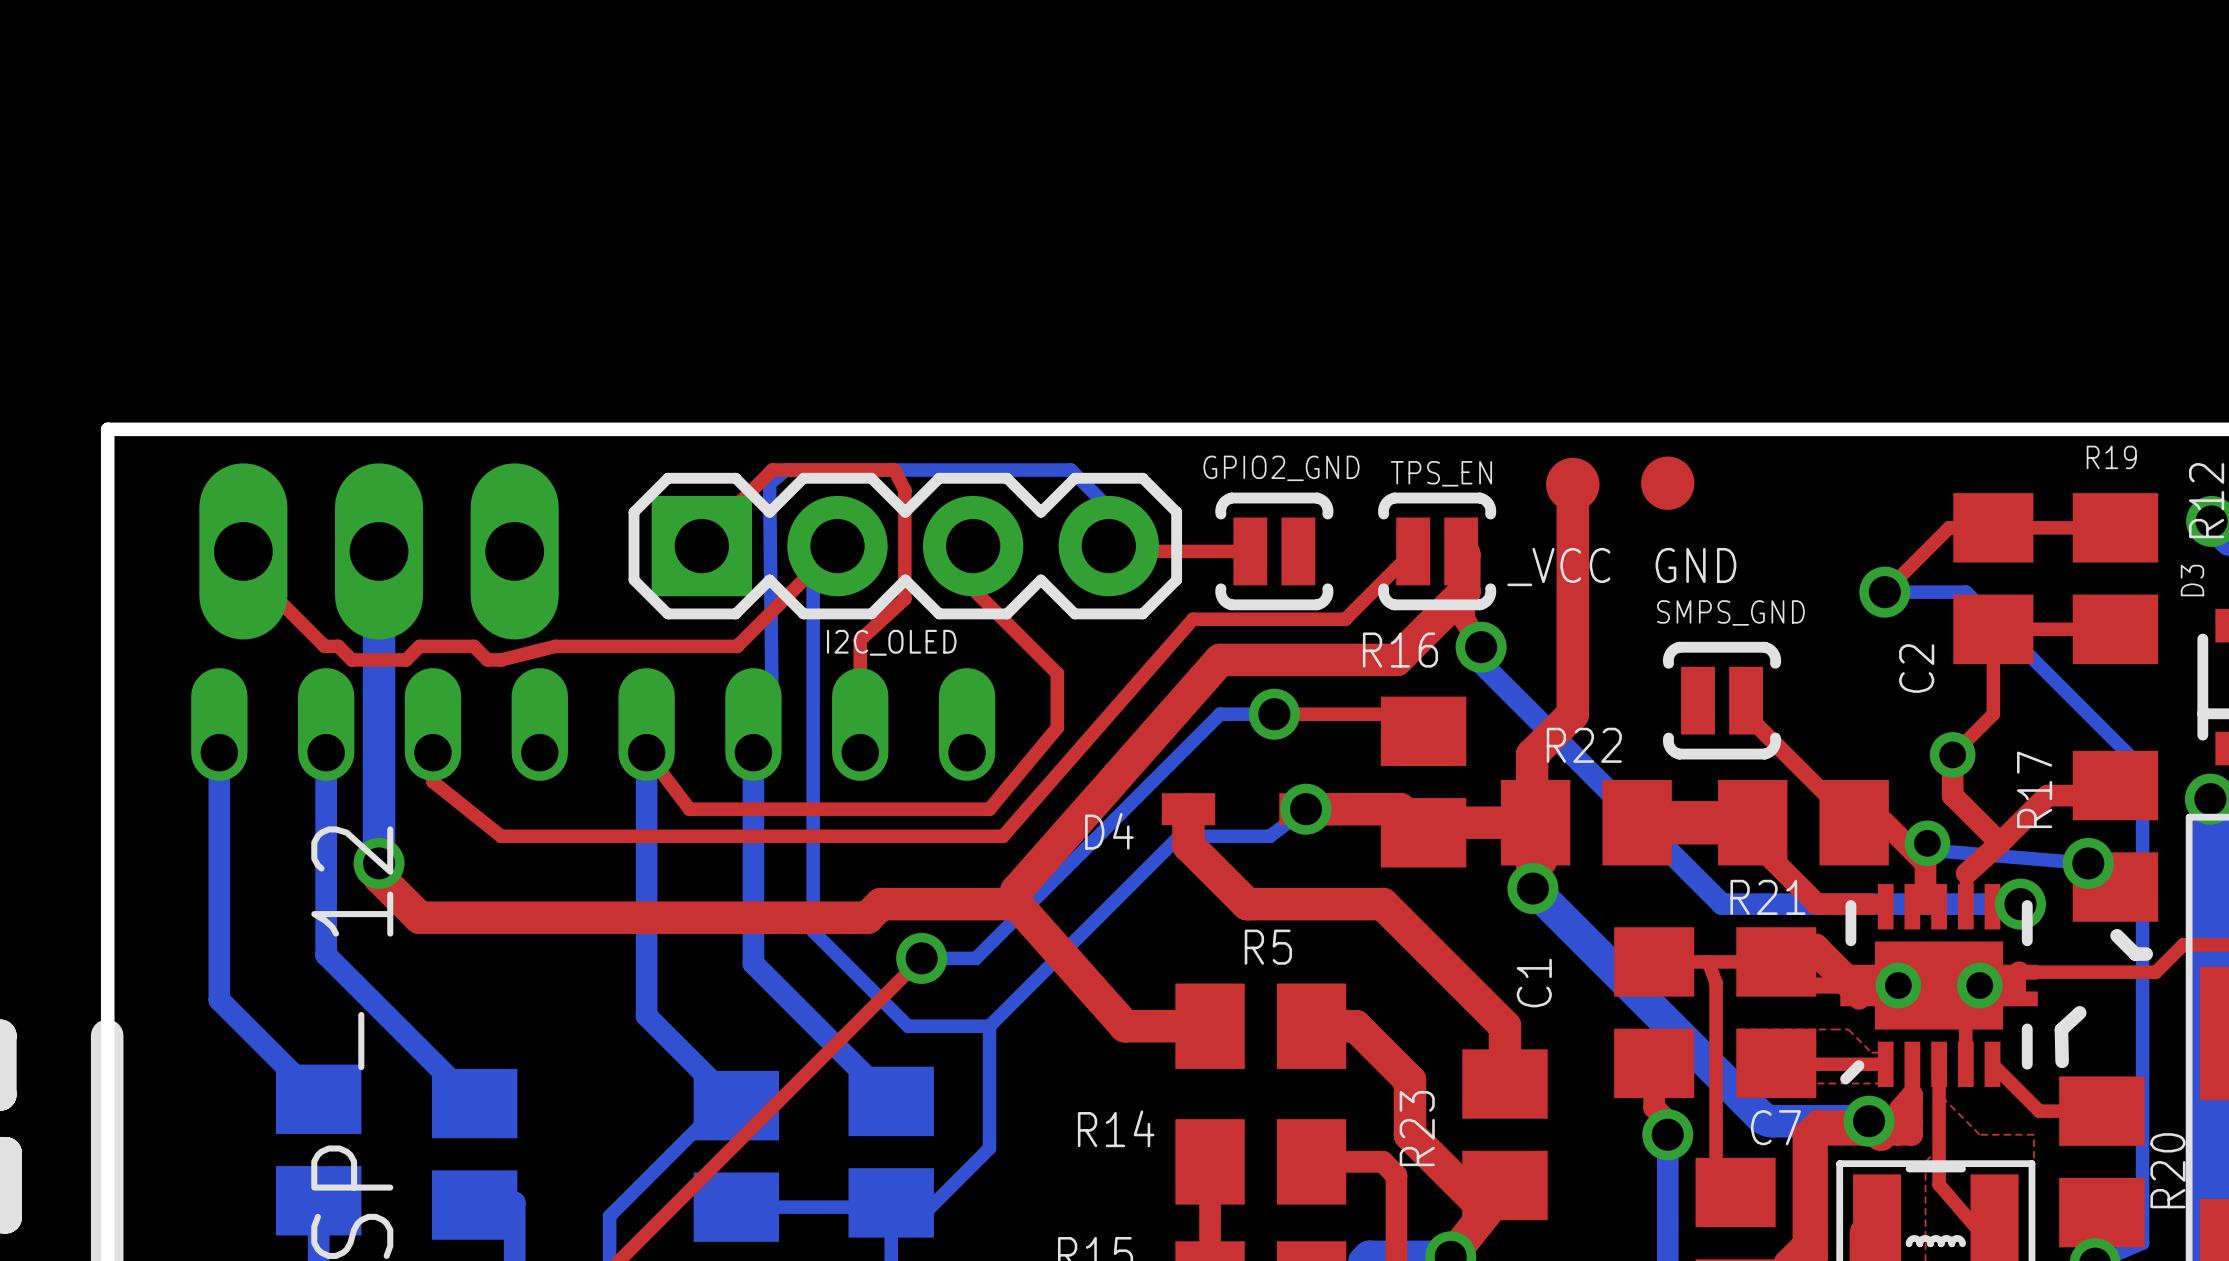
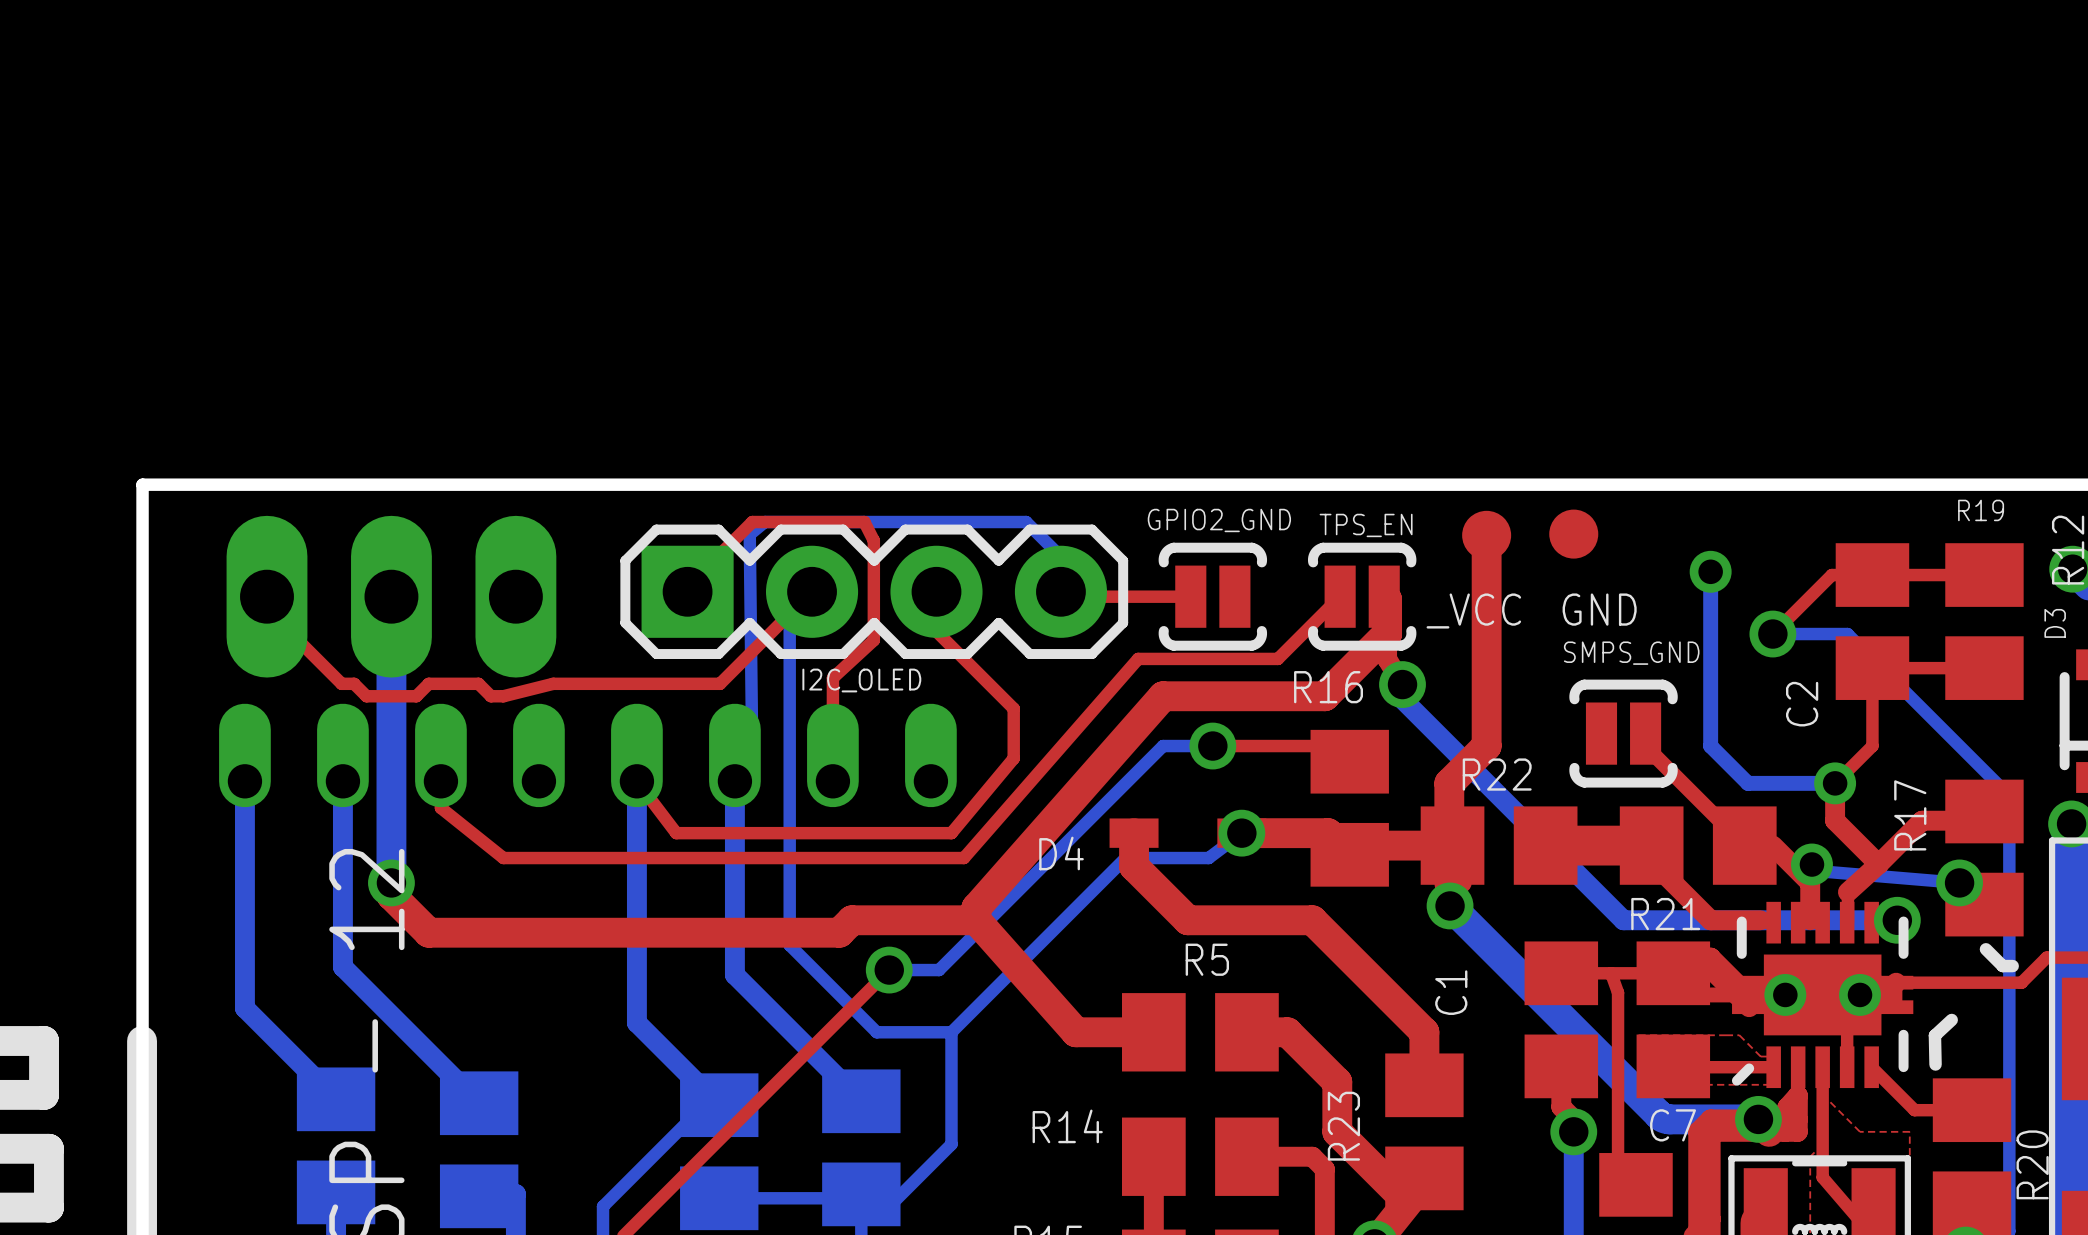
bottom track: none -> (1710, 571) (1710, 746) (1747, 783) (1835, 783)
via: none -> (1710, 571)

